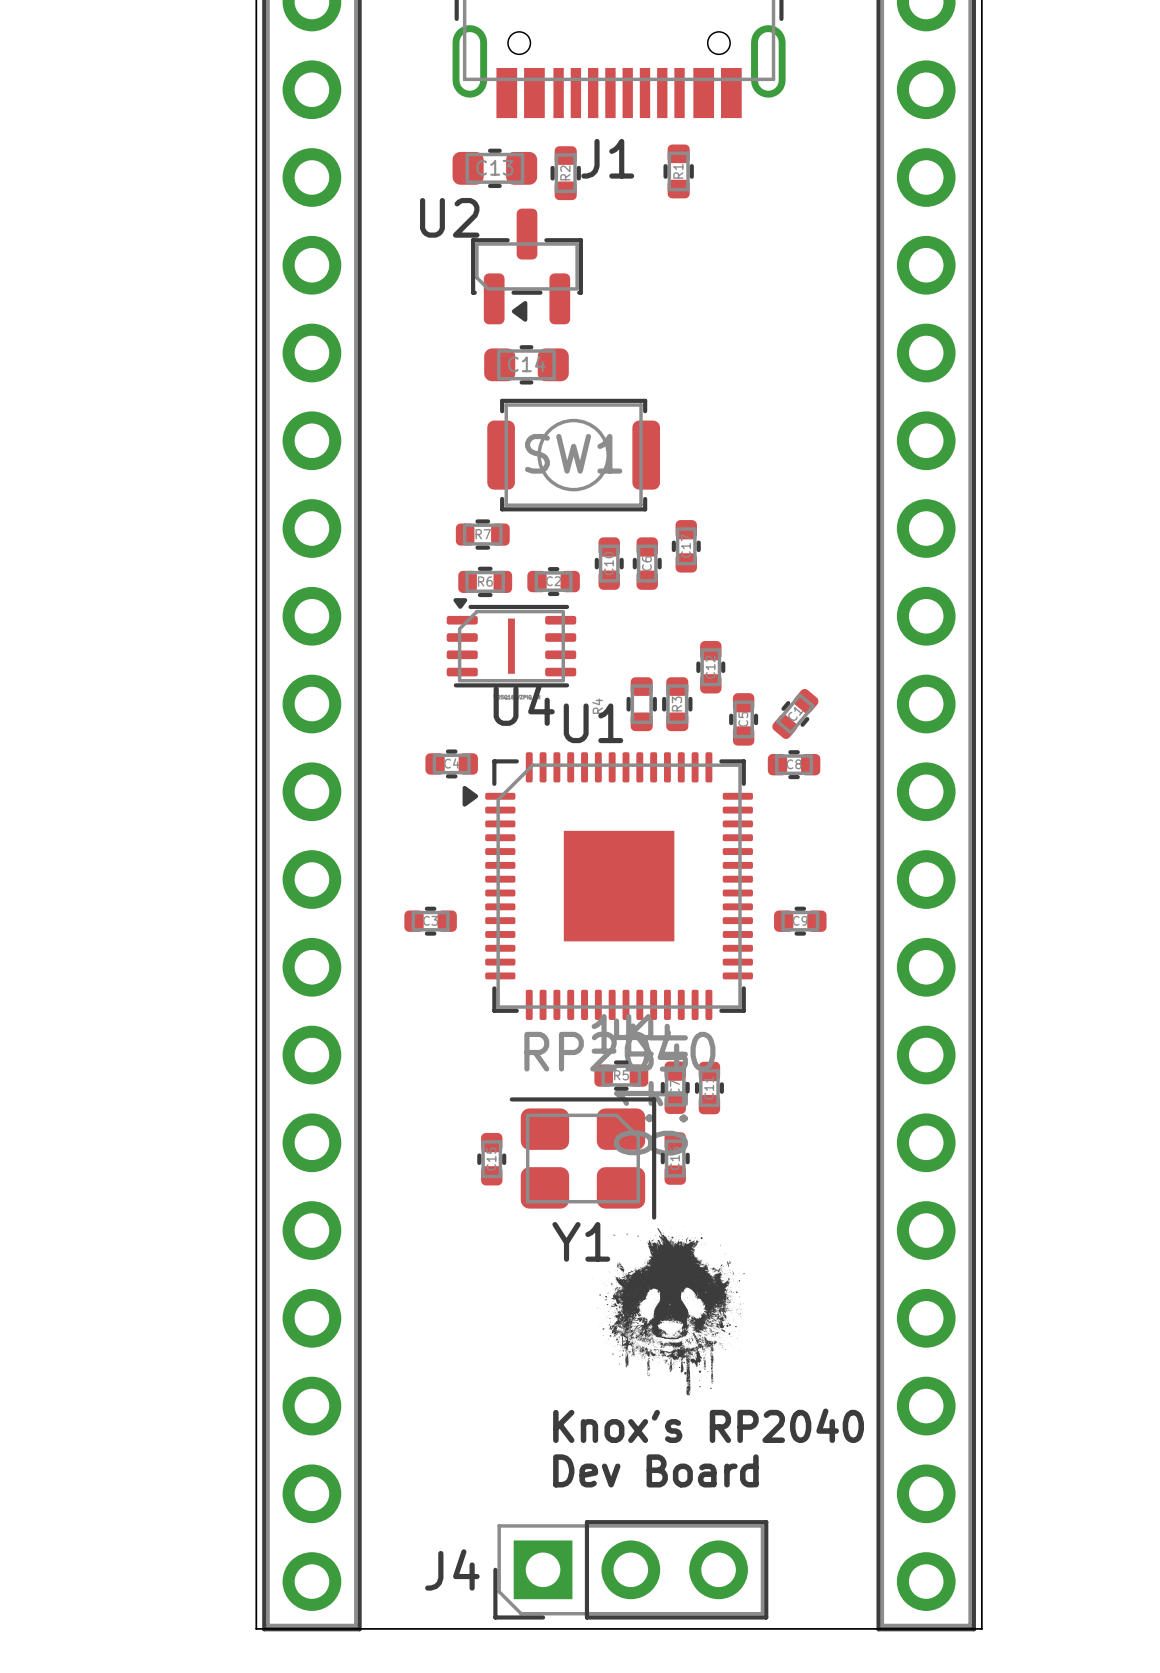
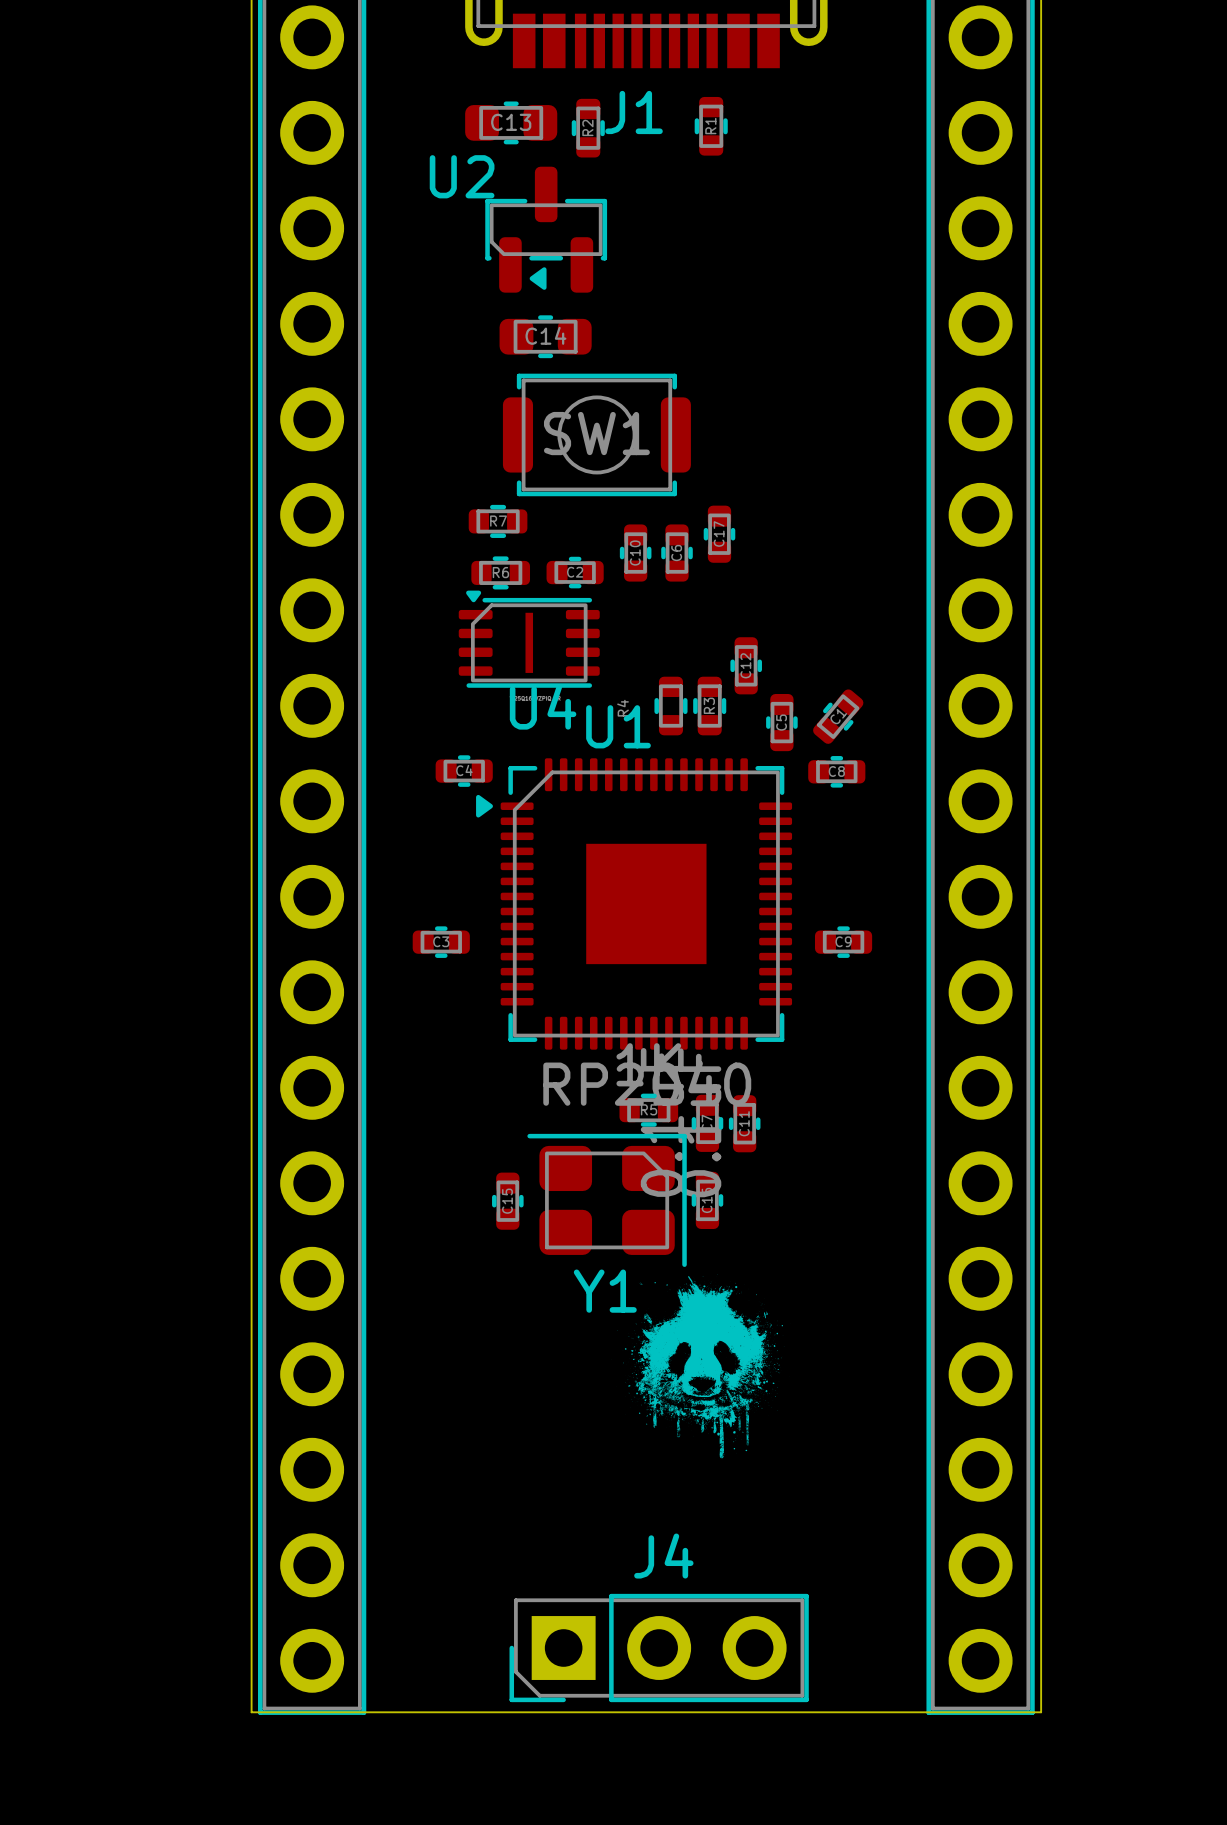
text: Knox's RP2040 (708, 1425) -> none
text: Dev Board (655, 1470) -> none
J4 name position: J4 (452, 1569) -> J4 (663, 1556)

